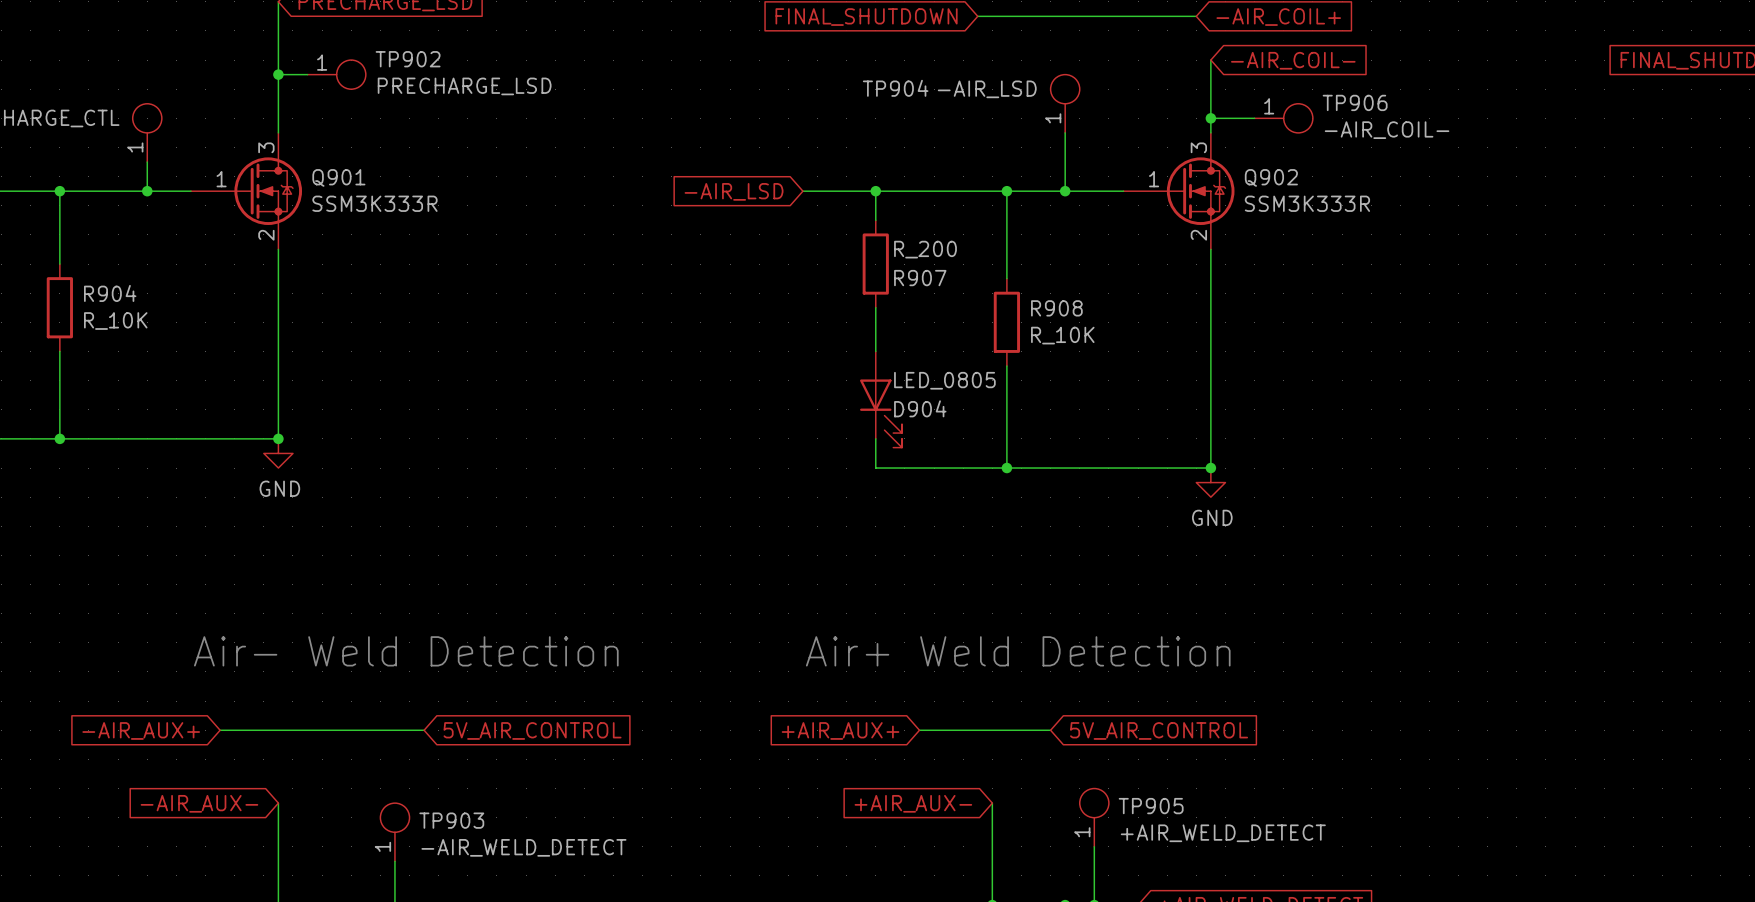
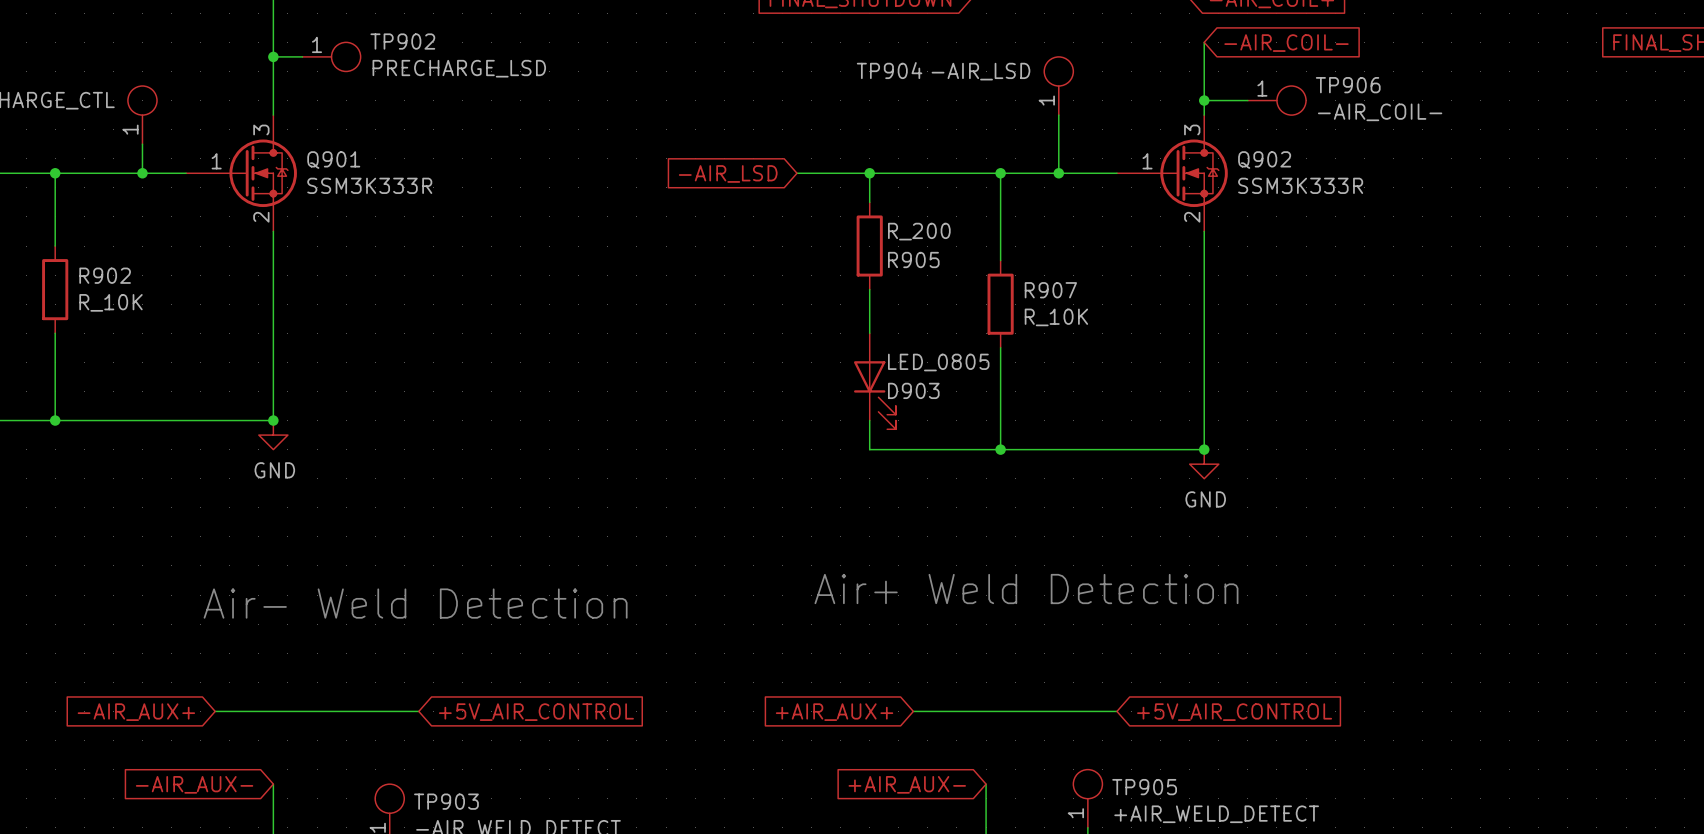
R907 name: R907 (920, 278) -> R905 (913, 260)
R904 name: R904 (110, 293) -> R902 (105, 275)
R908 name: R908 (1056, 308) -> R907 (1050, 290)
D904 name: D904 (920, 408) -> D903 (913, 390)
text position: Air- Weld Detection (406, 651) -> Air- Weld Detection (415, 603)
text position: Air+ Weld Detection (1018, 651) -> Air+ Weld Detection (1026, 589)
global label: 5V_AIR_CONTROL (532, 730) -> +5V_AIR_CONTROL (536, 712)
wire: none -> (1044, 711) (1116, 711)
global label: 5V_AIR_CONTROL (1159, 730) -> +5V_AIR_CONTROL (1234, 712)

